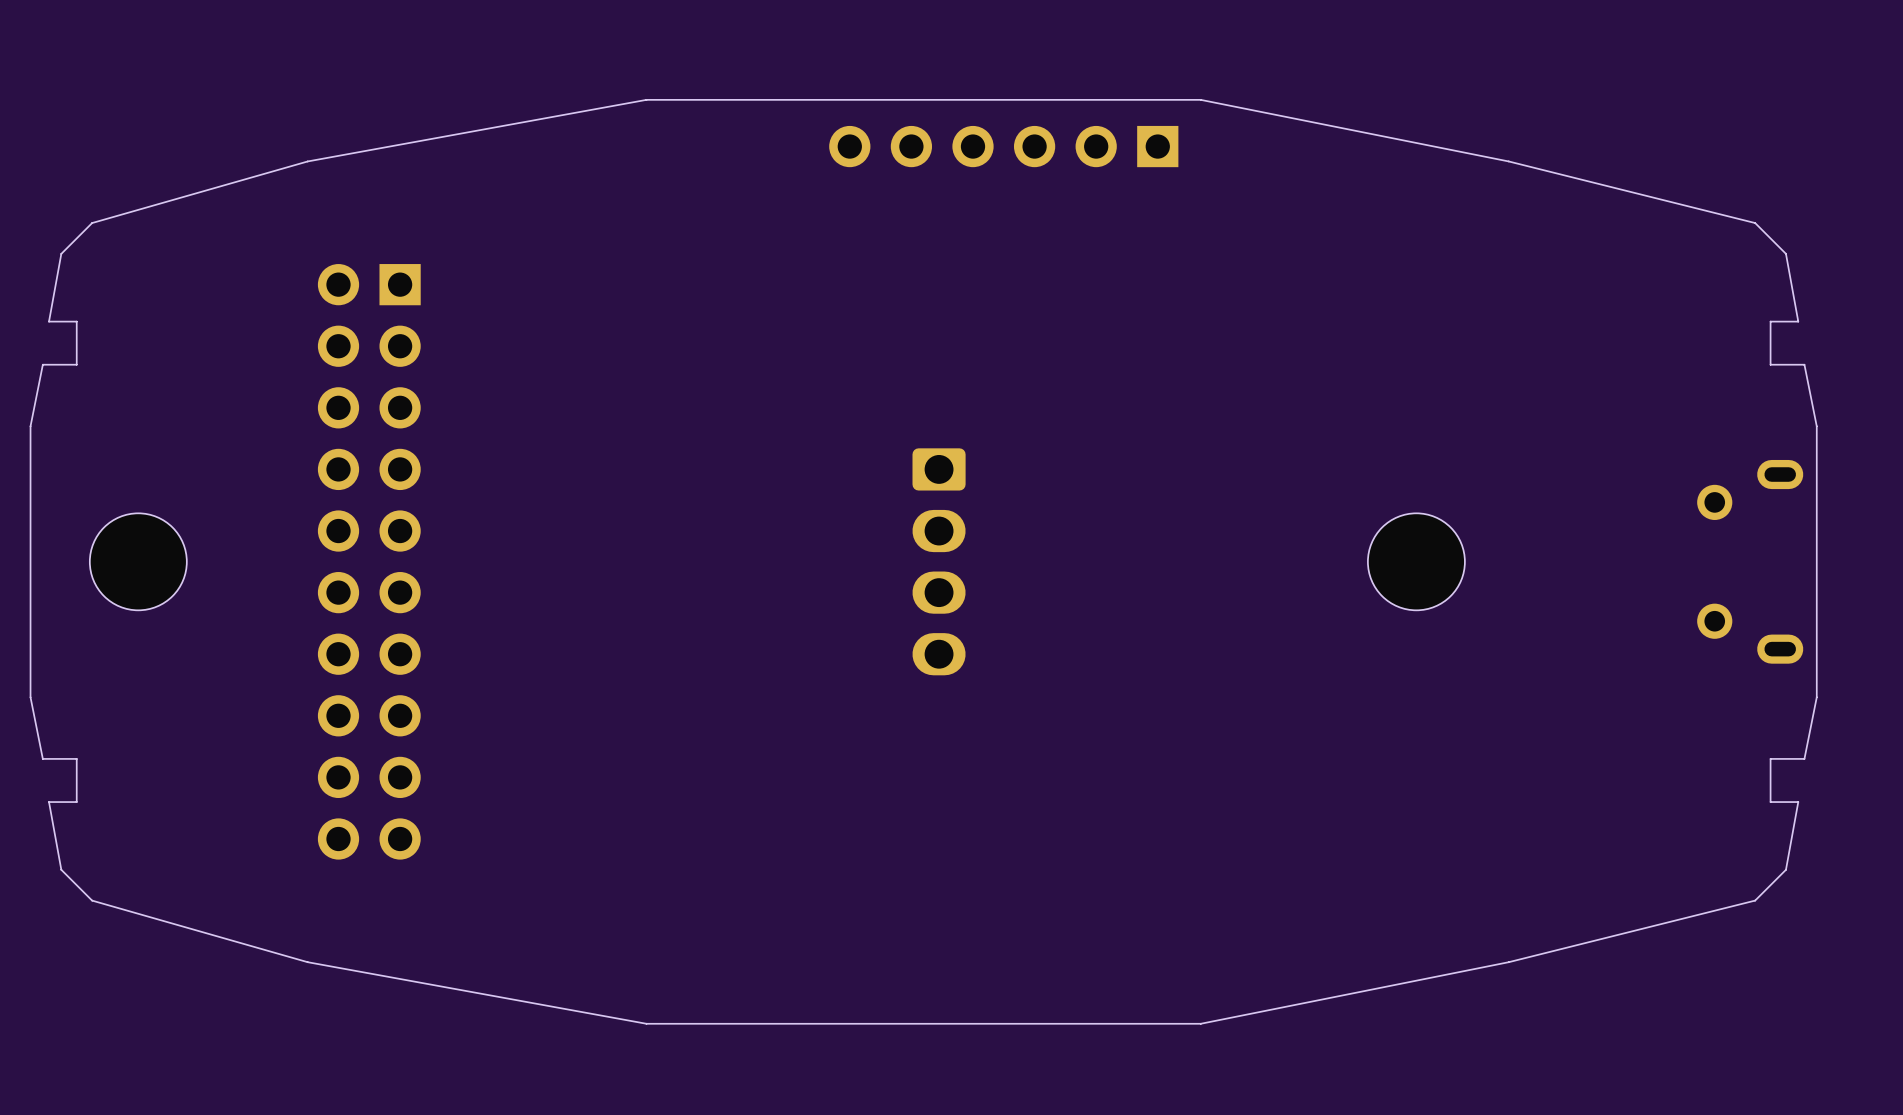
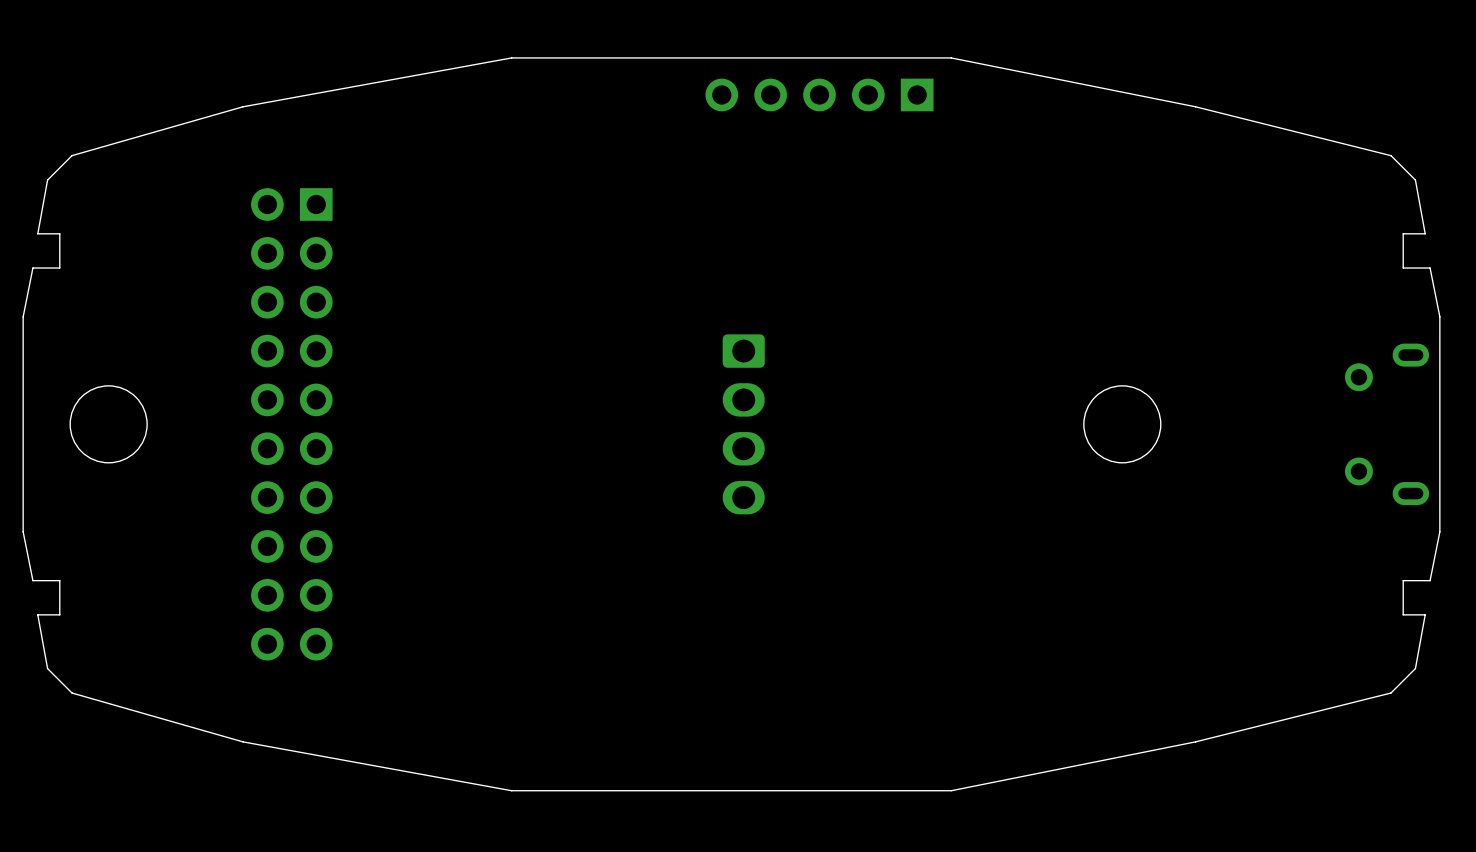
part: (1003, 146) -> none

